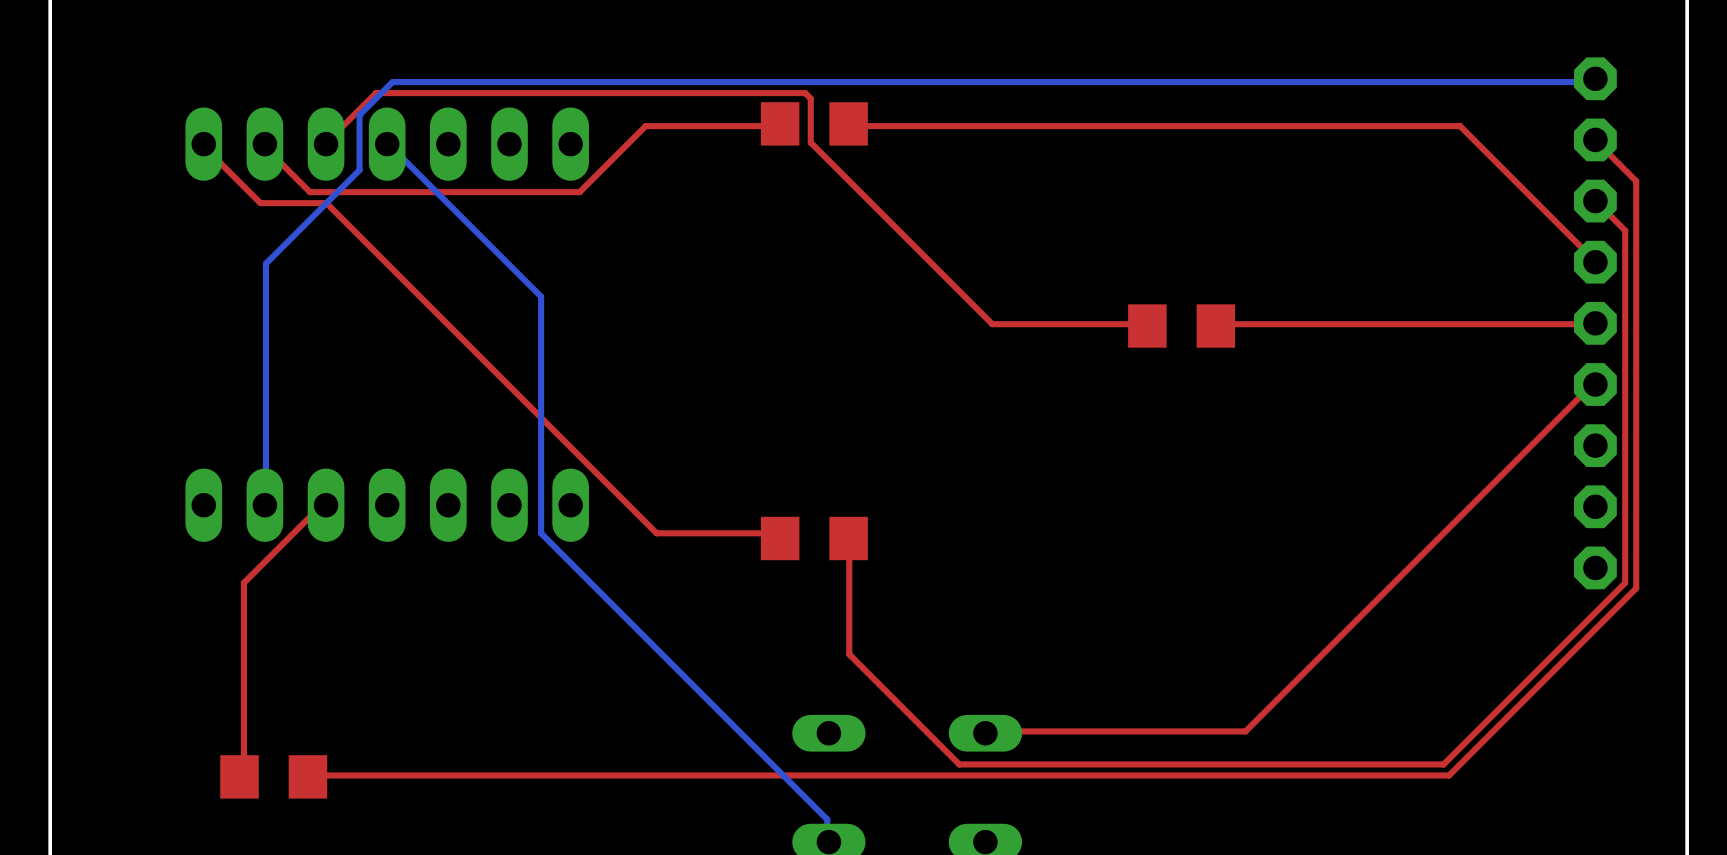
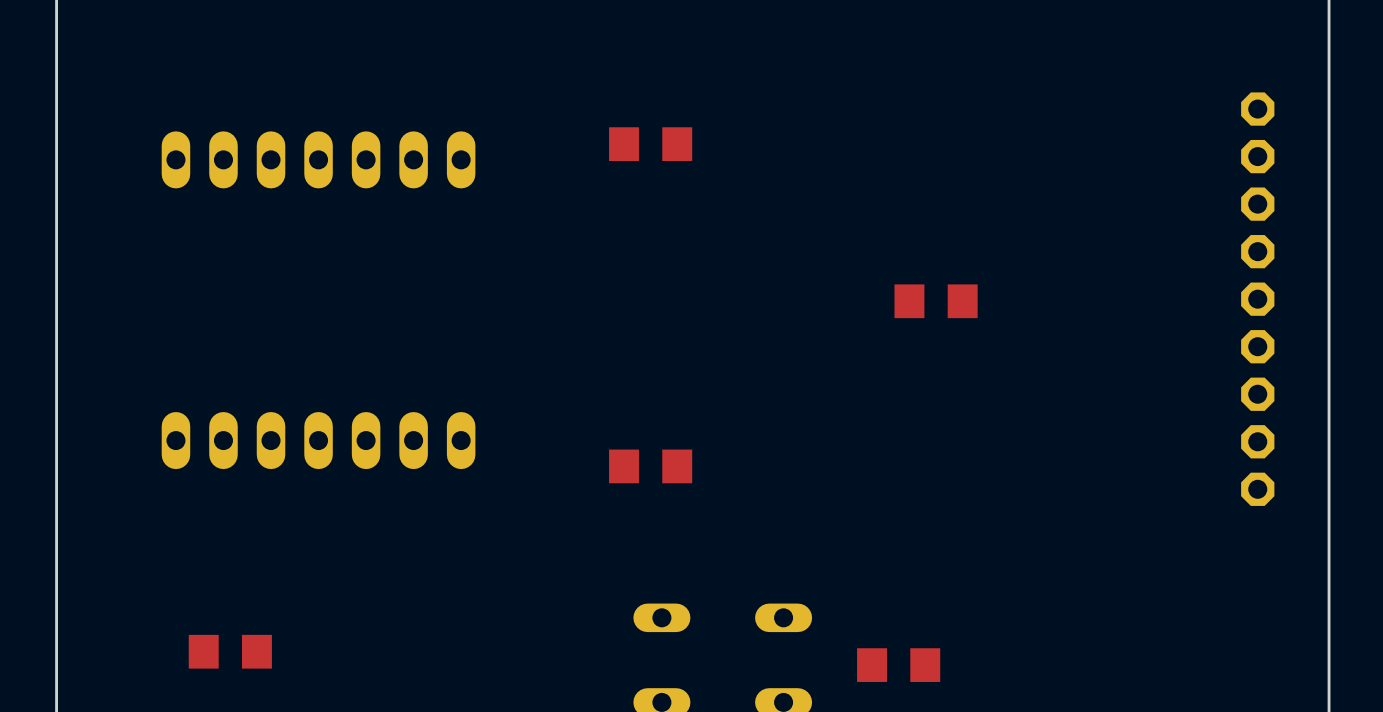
bottom track: (1595, 78) (1592, 82) (392, 82) (359, 115) (359, 170) (265, 263) (264, 505) -> none
top track: (780, 123) (777, 126) (645, 126) (579, 192) (309, 192) (265, 148) (264, 144) -> none
top track: (848, 123) (849, 126) (1460, 126) (1595, 262) -> none
top track: (1595, 139) (1636, 181) (1636, 588) (1449, 775) (307, 776) -> none
top track: (203, 144) (205, 148) (260, 203) (326, 203) (656, 533) (777, 533) (780, 538) -> none
top track: (326, 144) (376, 93) (805, 93) (810, 98) (810, 142) (992, 324) (1146, 324) (1147, 326) -> none
bottom track: (387, 144) (541, 296) (541, 533) (827, 819) (827, 841) (828, 842) -> none
top track: (1595, 201) (1625, 230) (1625, 582) (1443, 764) (959, 764) (849, 654) (848, 538) -> none
top track: (1595, 323) (1218, 324) (1215, 326) -> none
top track: (1595, 384) (1592, 384) (1245, 731) (986, 731) (985, 733) -> none
top track: (326, 505) (321, 505) (243, 582) (243, 775) (239, 776) -> none
part: none -> (898, 665)

